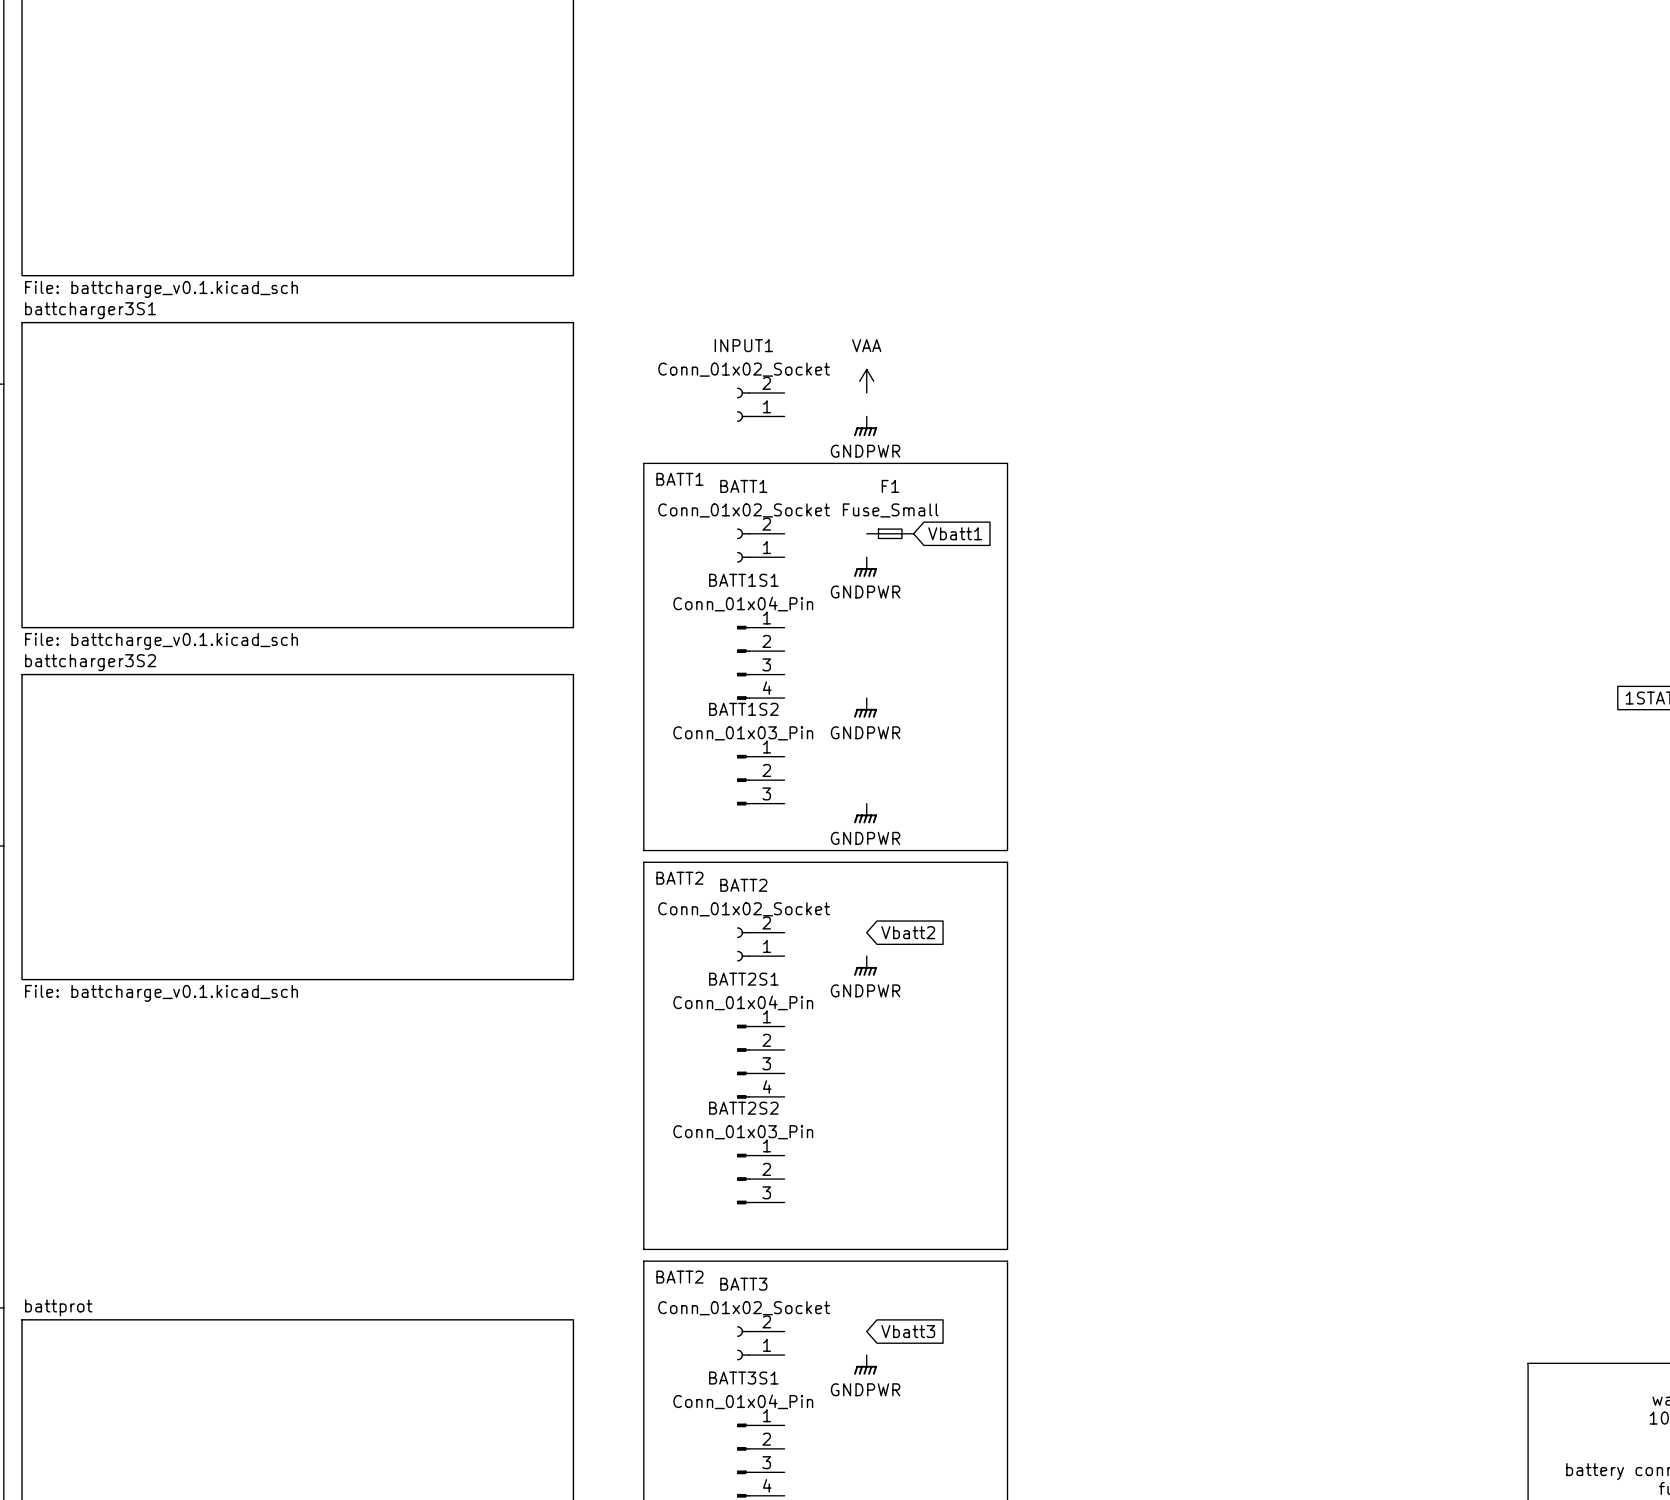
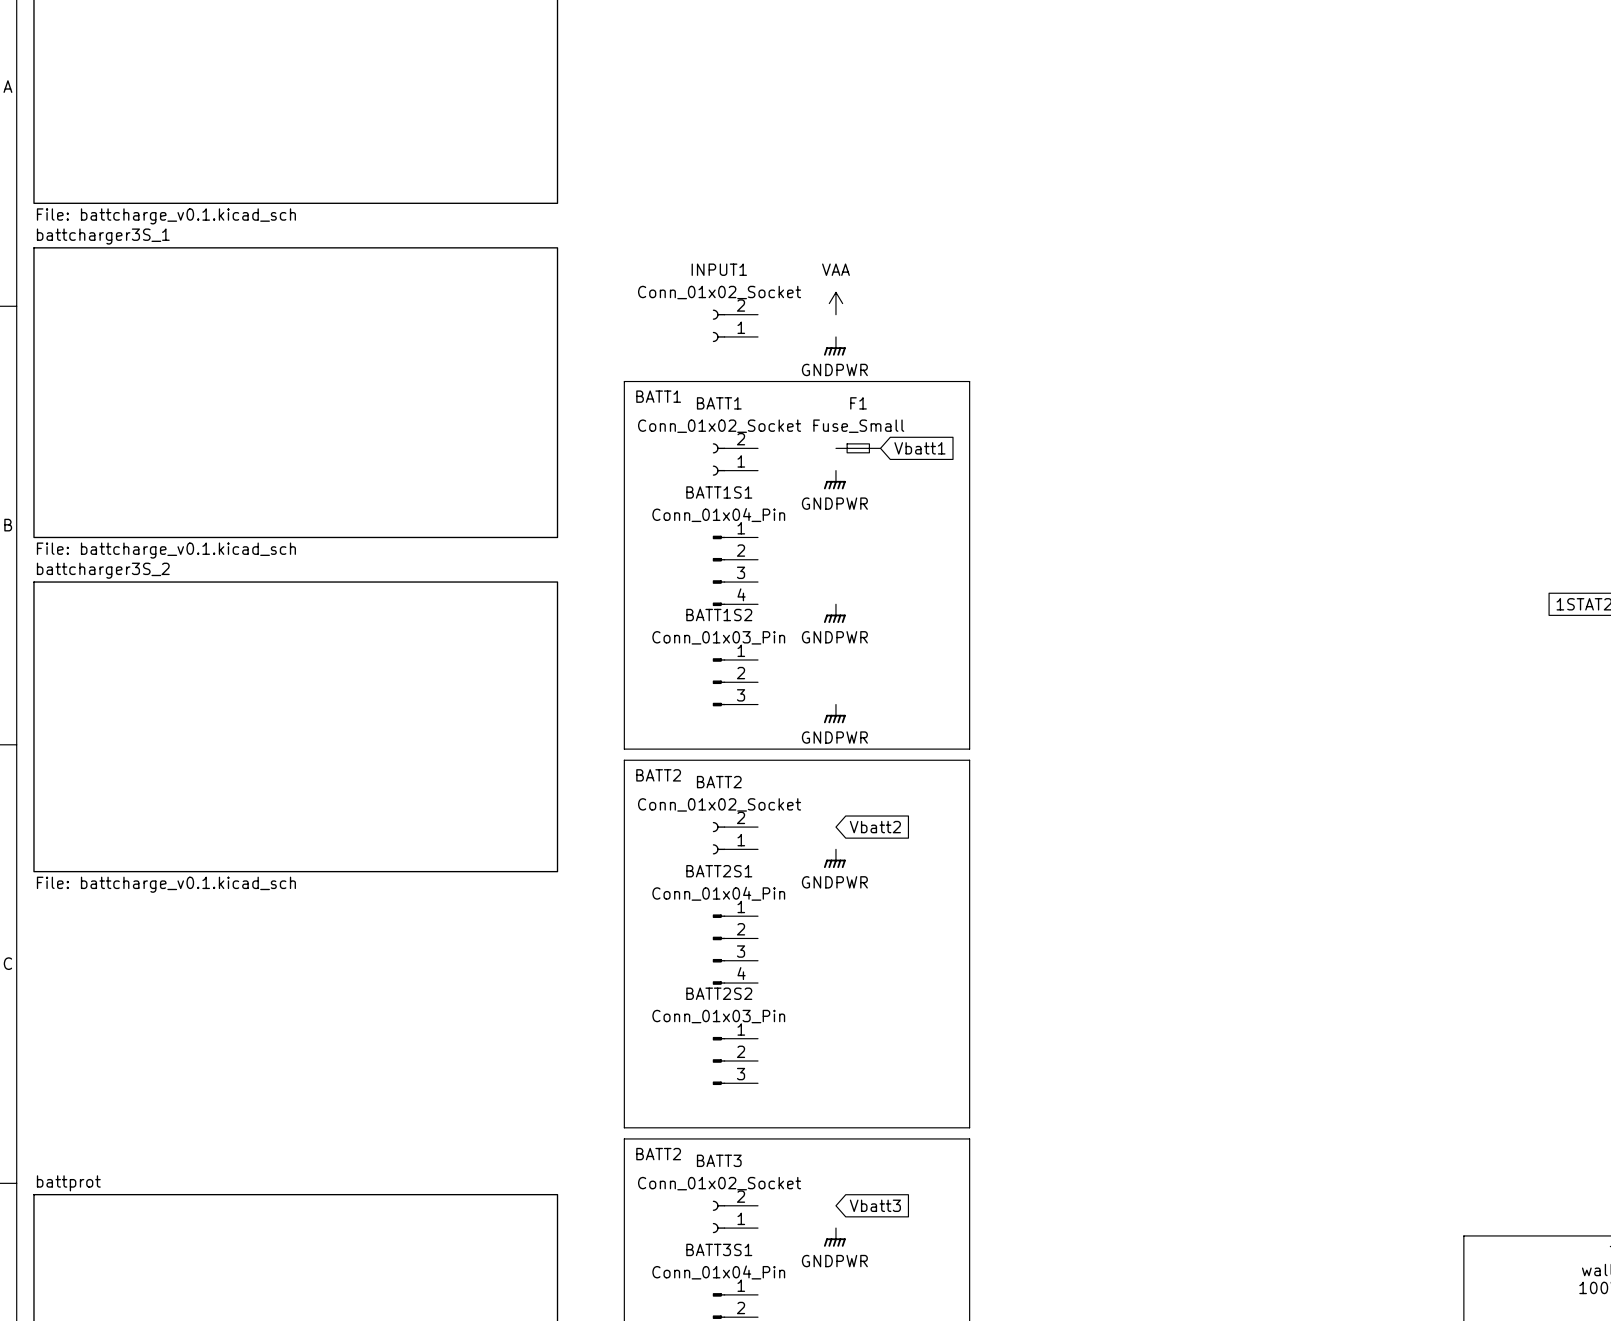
sheet battcharger3S1 name: battcharger3S1 (90, 310) -> battcharger3S_1 (103, 236)
sheet battcharger3S2 name: battcharger3S2 (90, 662) -> battcharger3S_2 (103, 570)

